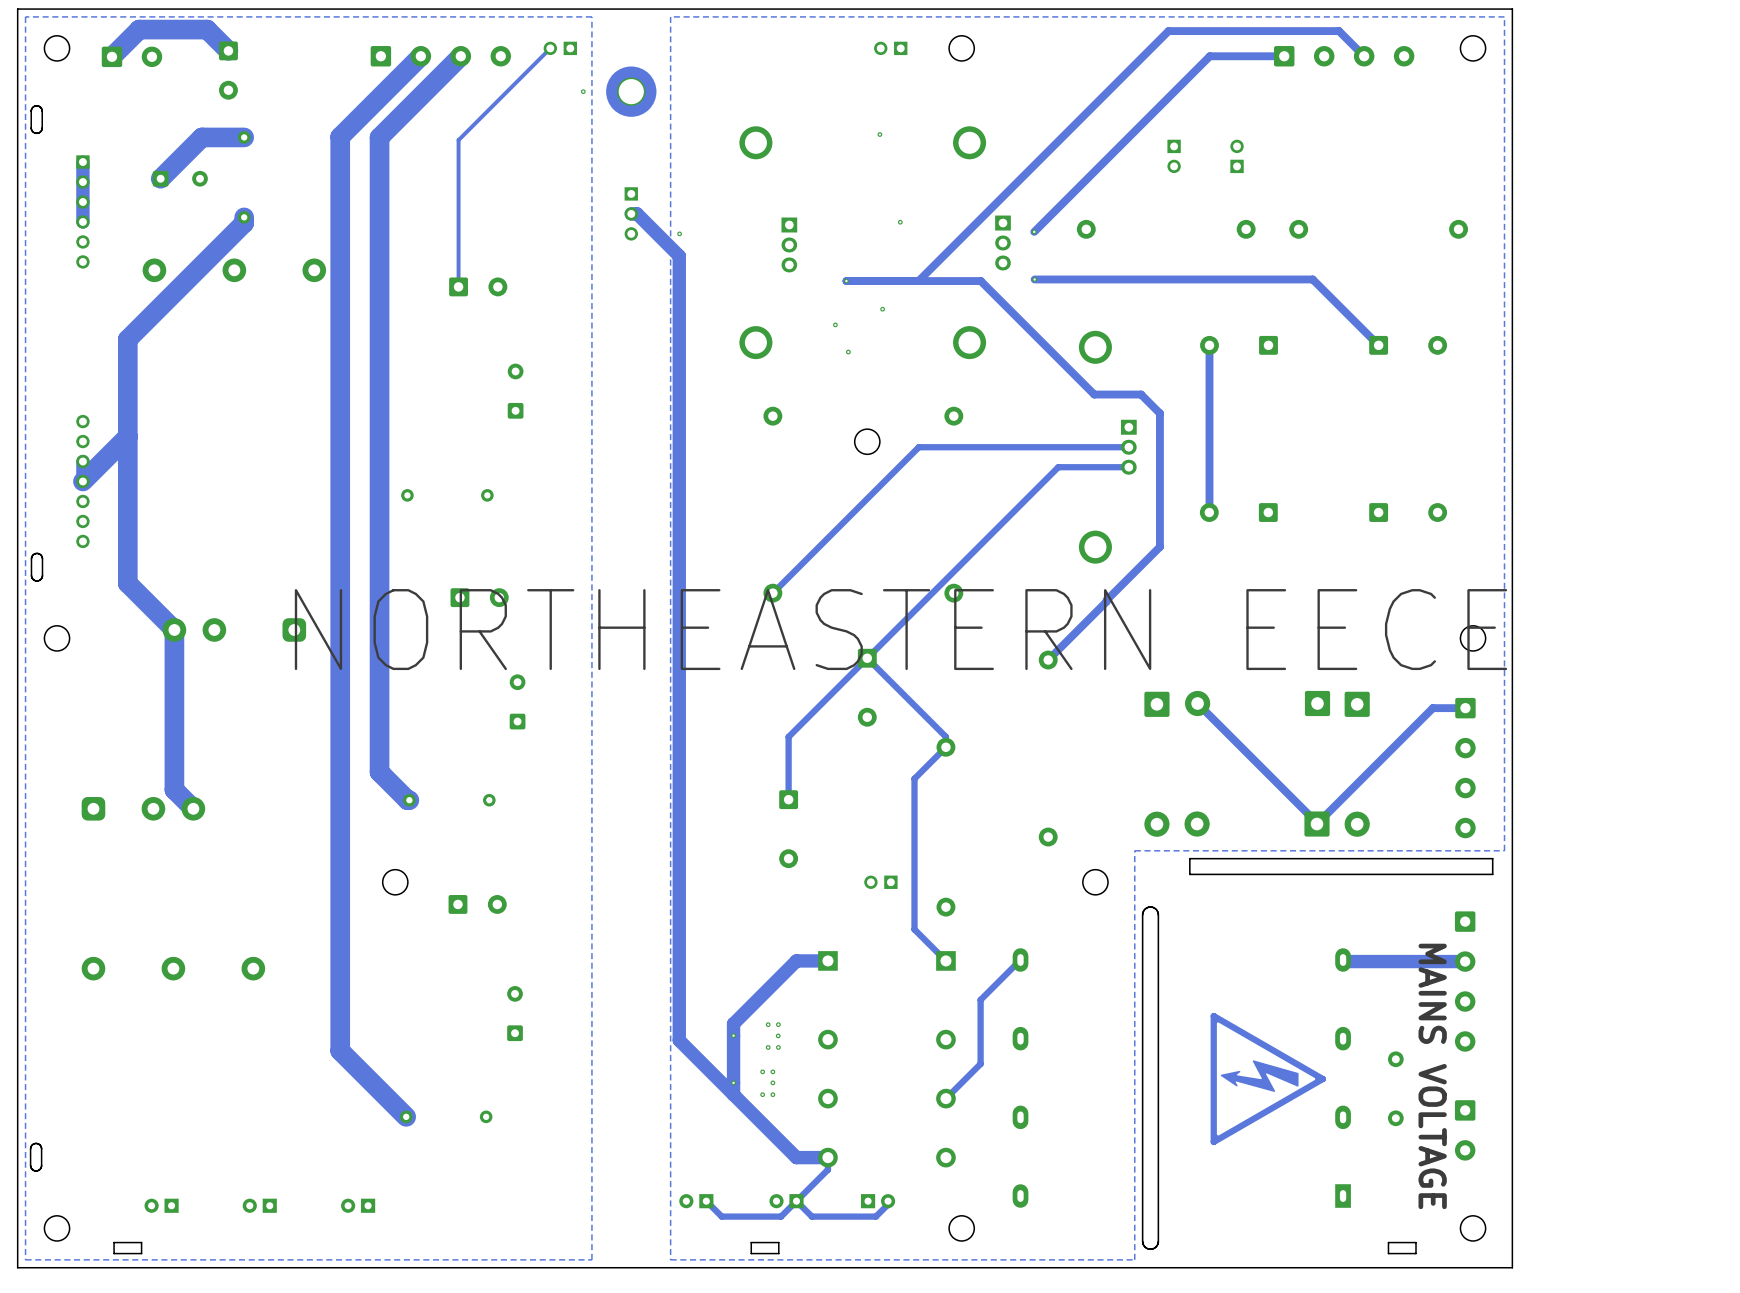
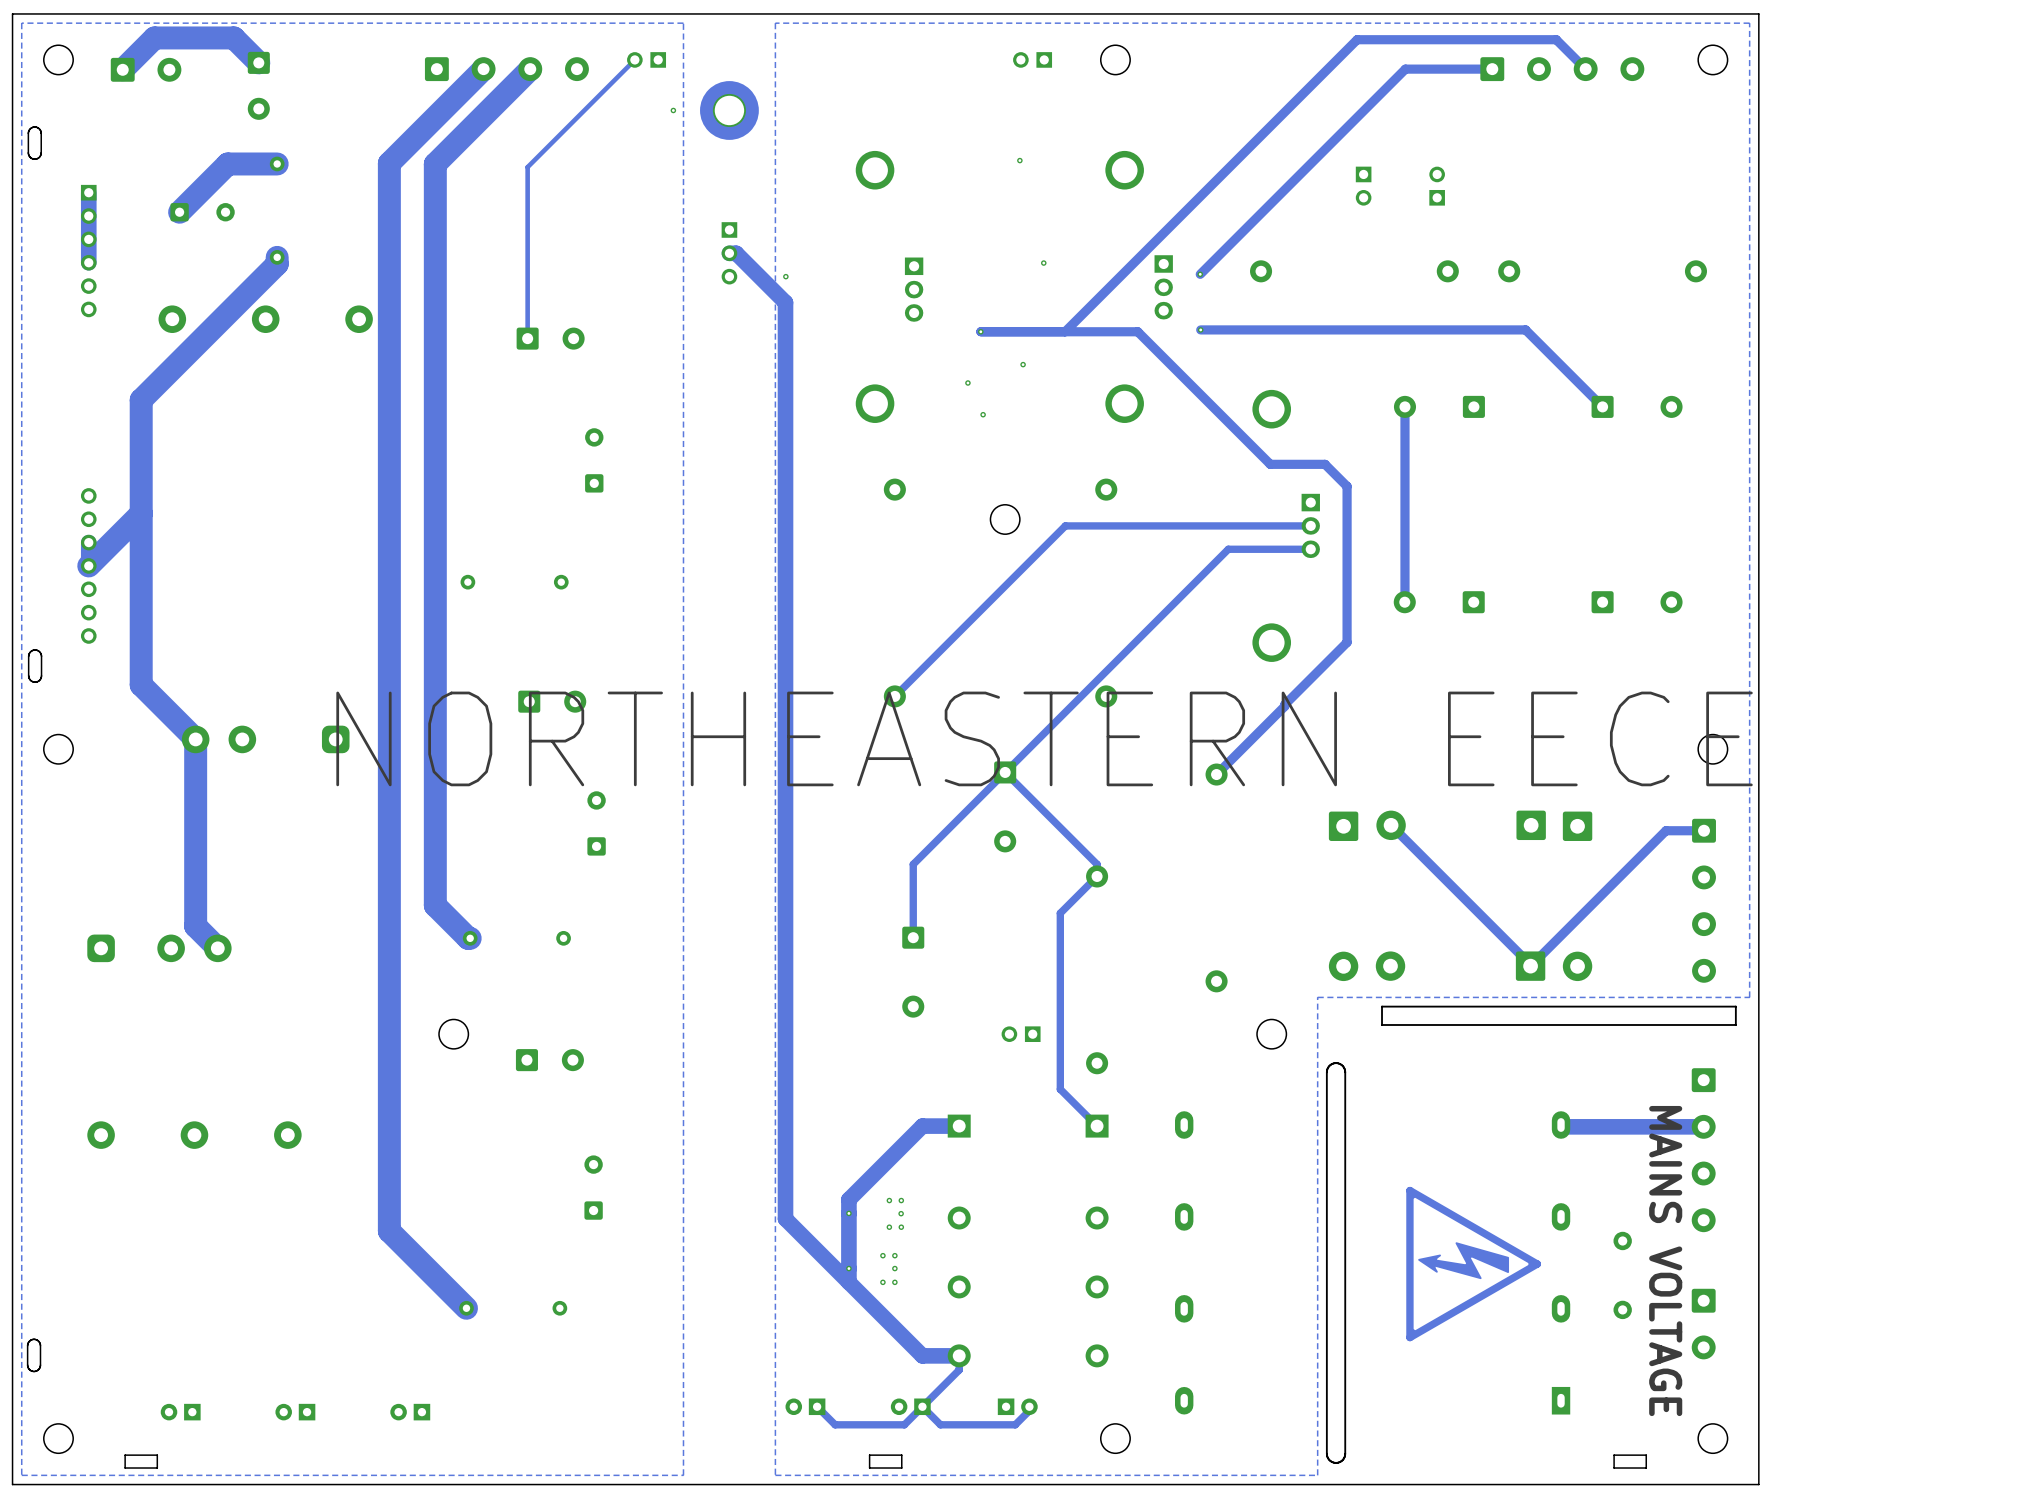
track: (1020, 960) (980, 999) (980, 1063) (945, 1098) -> none

